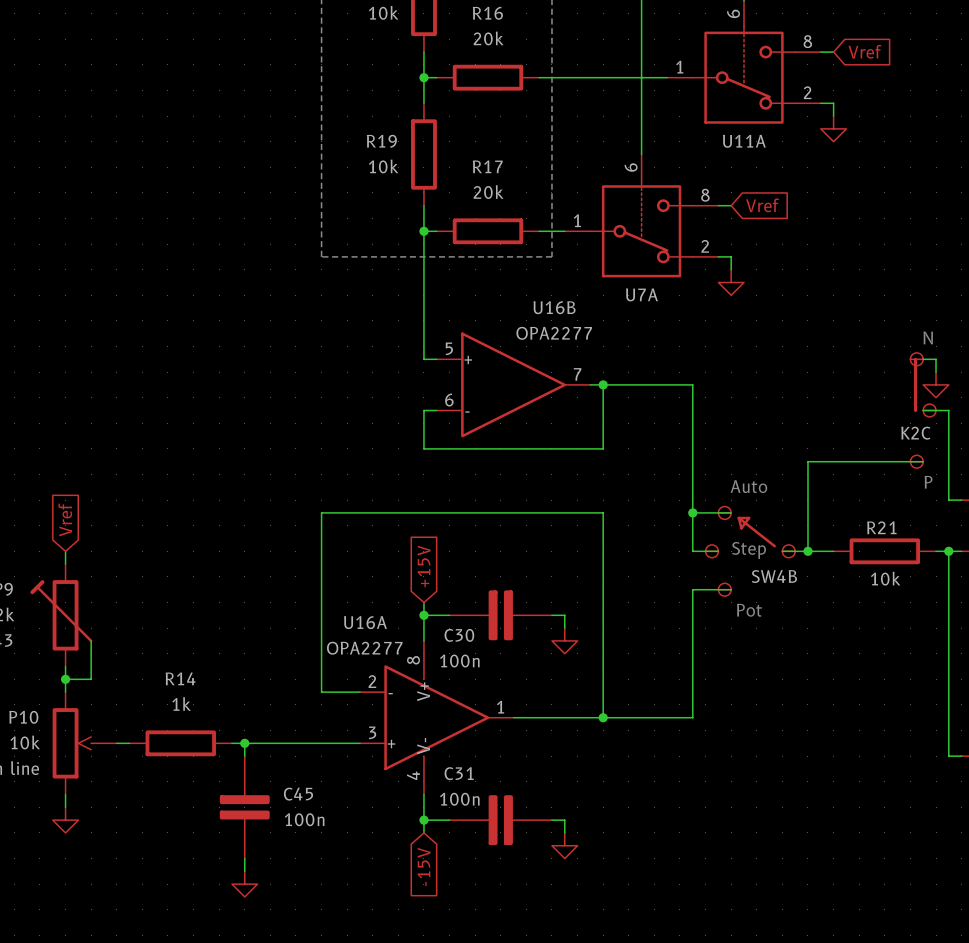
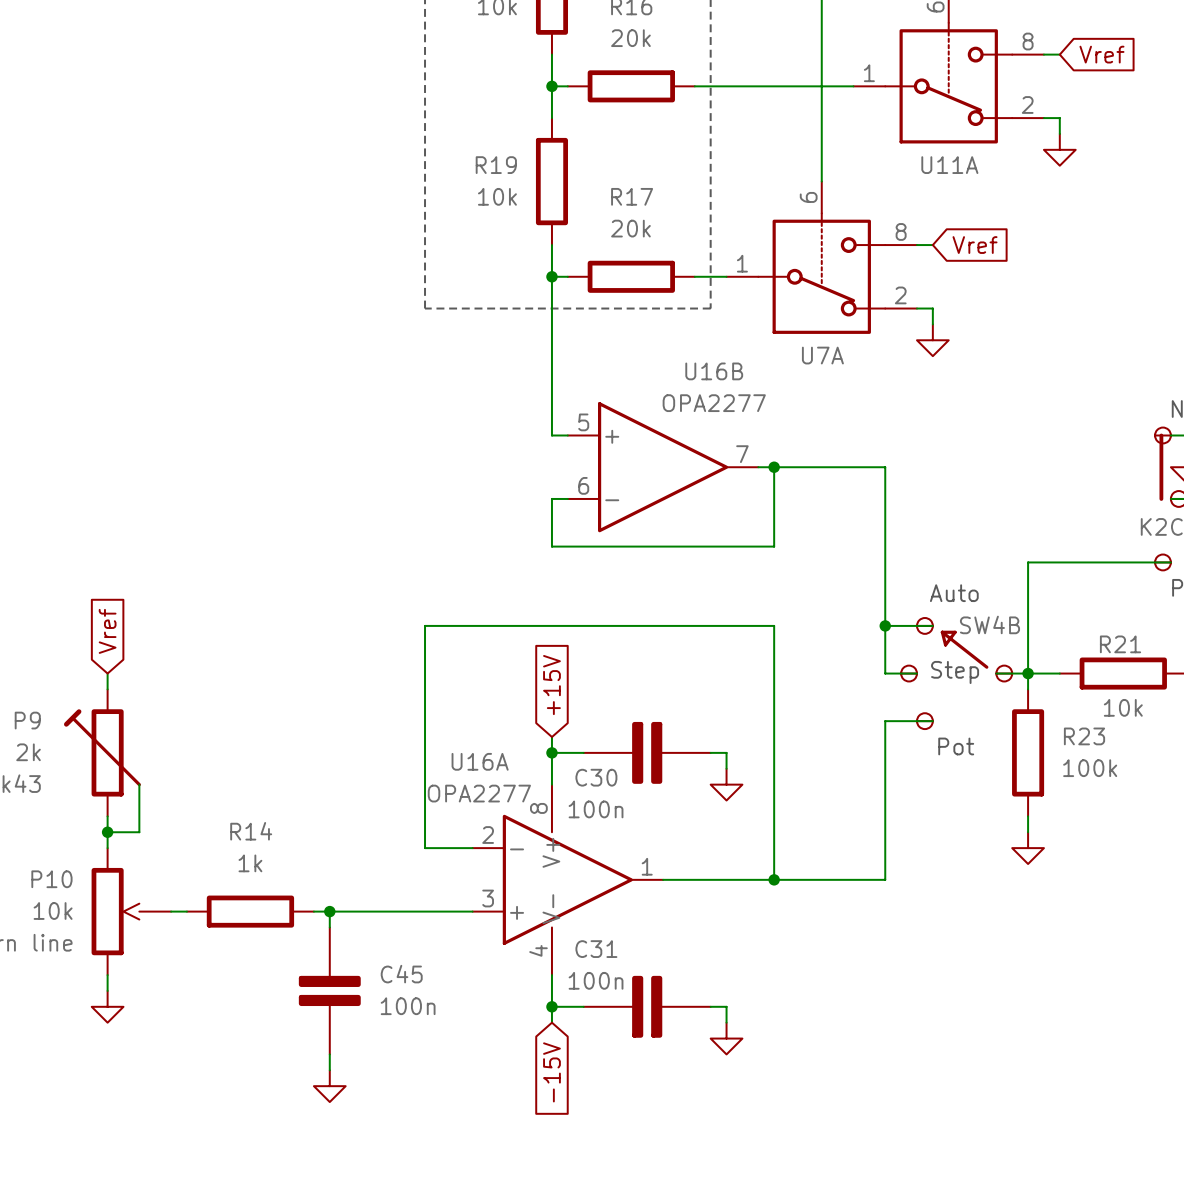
wire: none -> (1028, 673) (1028, 689)
SW4B name position: SW4B (774, 576) -> SW4B (989, 624)
R23: none -> 100k (1028, 752)
wire: none -> (1028, 816) (1028, 832)
power symbol: none -> (1028, 848)

